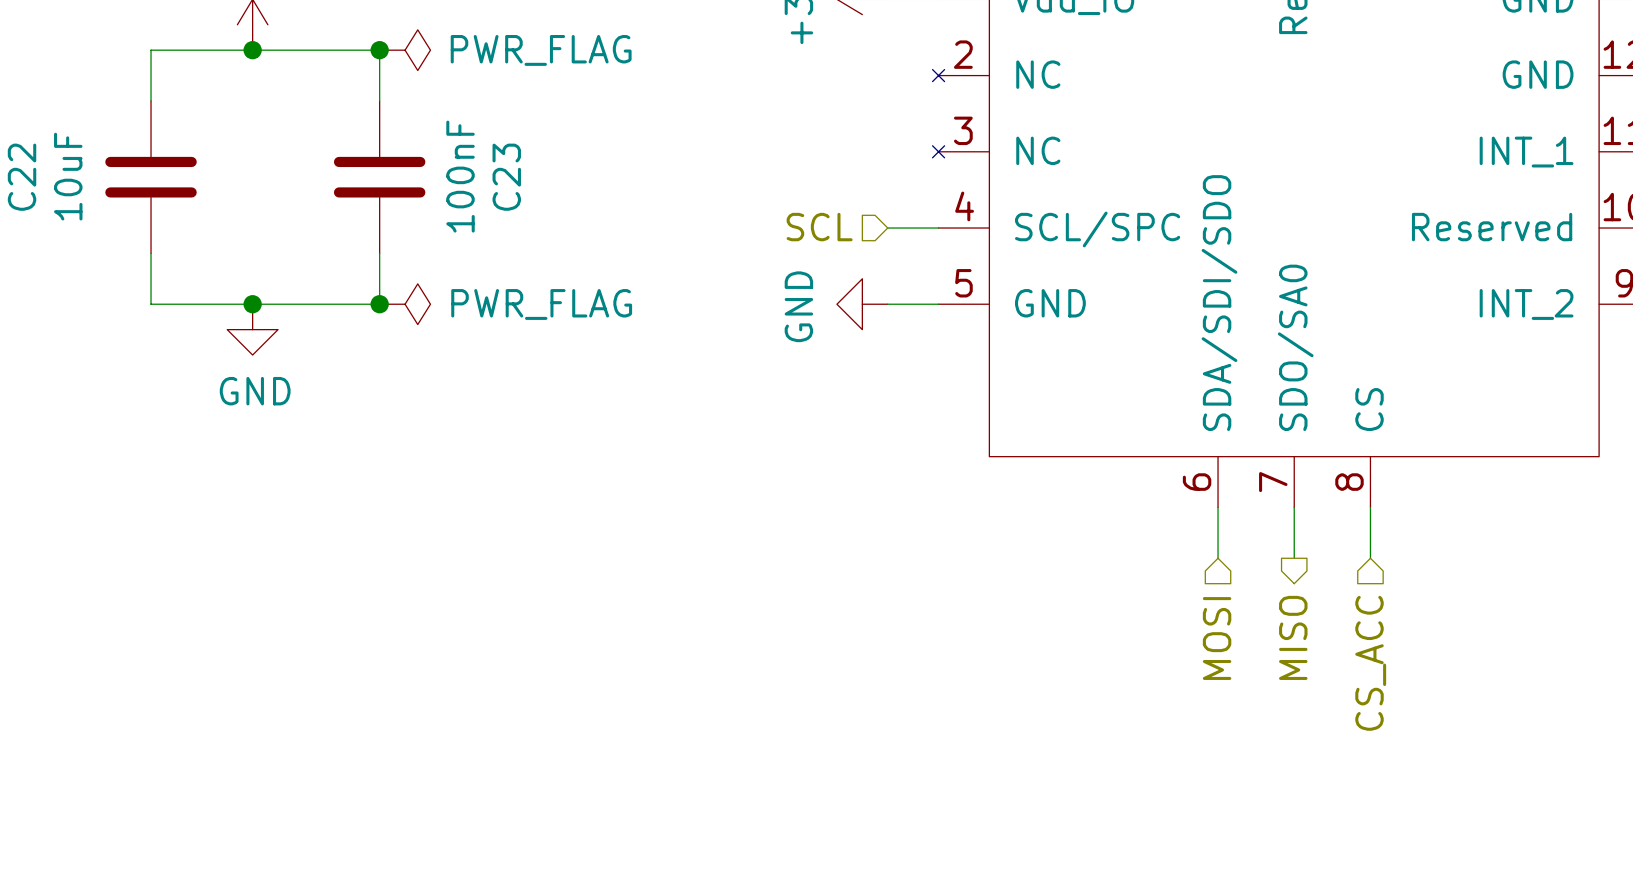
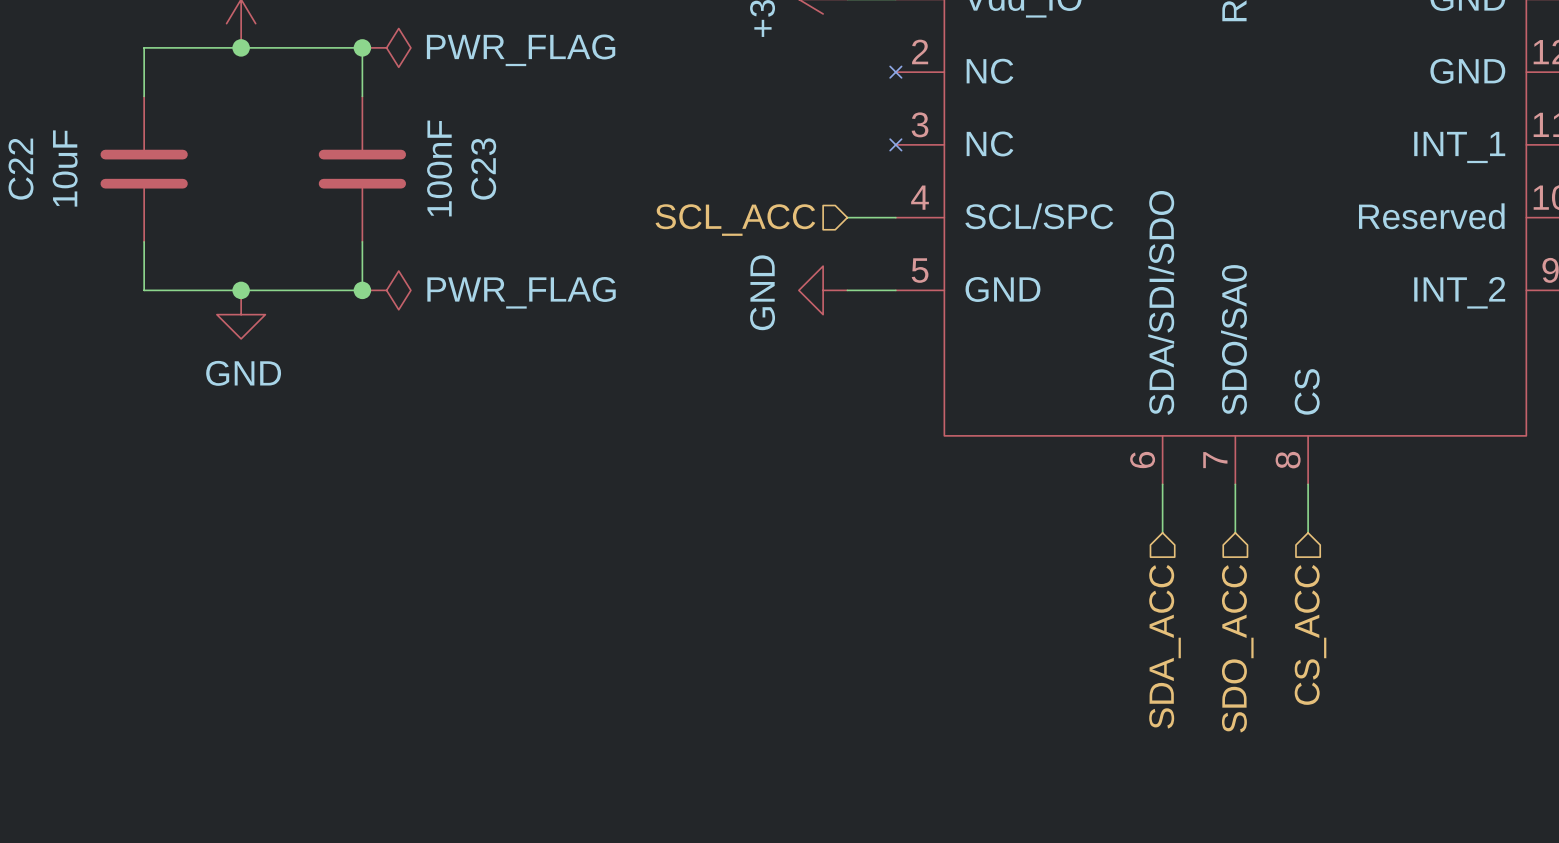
hierarchical label: SCL (819, 227) -> SCL_ACC (735, 220)
hierarchical label shape: output (1293, 637) -> input (1237, 648)
hierarchical label: MISO (1293, 637) -> SDO_ACC (1237, 648)
hierarchical label: MOSI (1217, 638) -> SDA_ACC (1165, 646)

